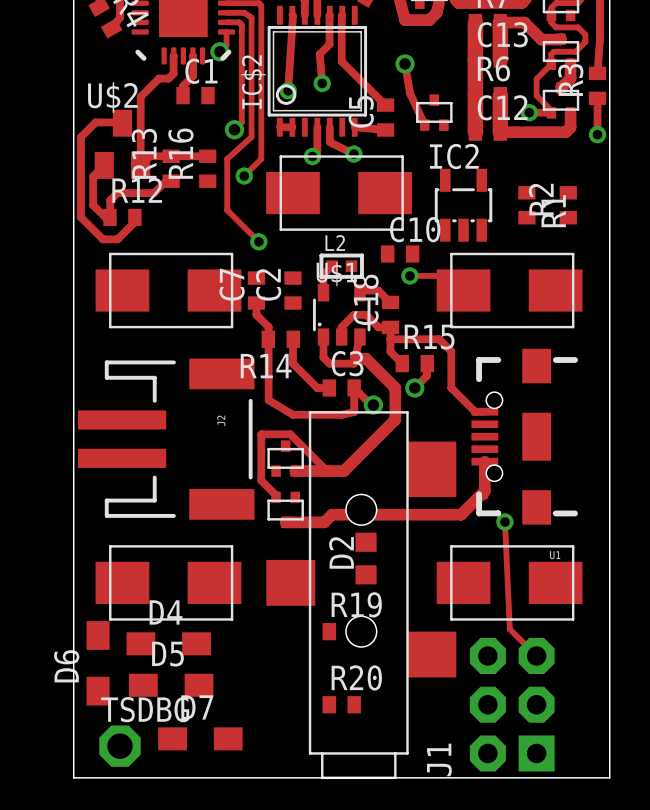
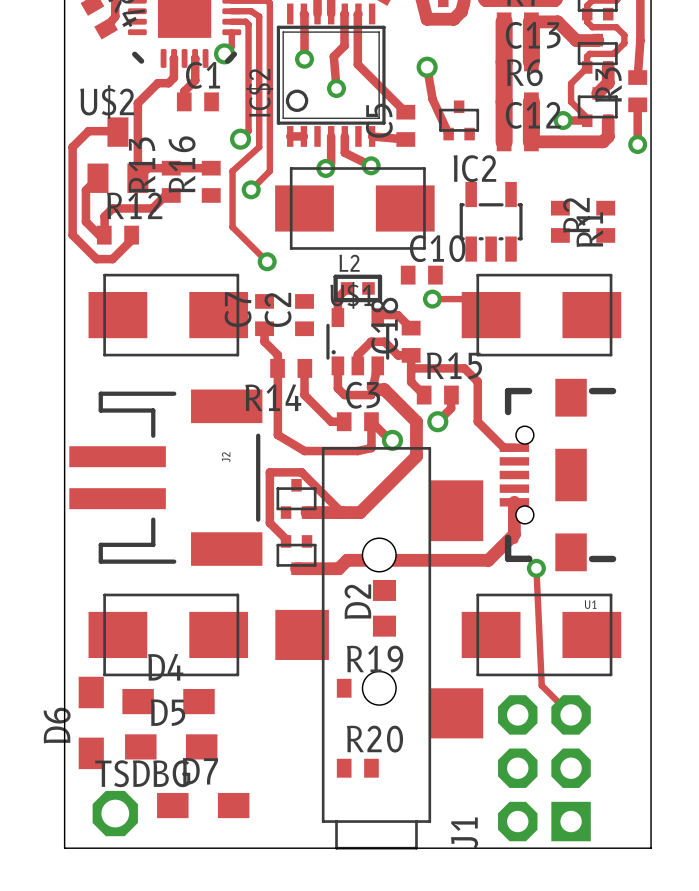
track: (292, 15) (288, 90) -> (304, 14) (304, 59)
via position: (288, 90) -> (304, 59)

